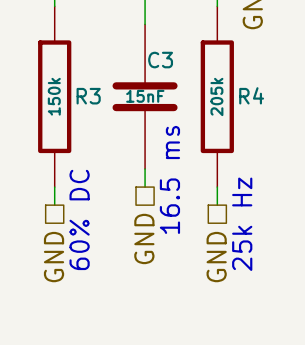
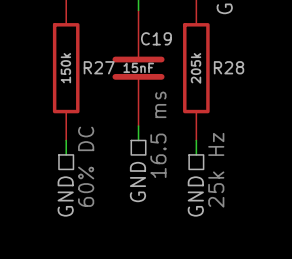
C3 name: C3 (160, 60) -> C19 (156, 38)
R4 name: R4 (251, 95) -> R28 (229, 67)
R3 name: R3 (88, 96) -> R27 (99, 67)

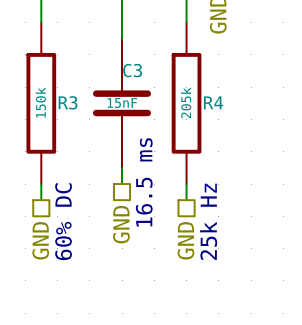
C19 name: C19 (156, 38) -> C3 (132, 70)
R27 name: R27 (99, 67) -> R3 (68, 102)
R28 name: R28 (229, 67) -> R4 (213, 102)

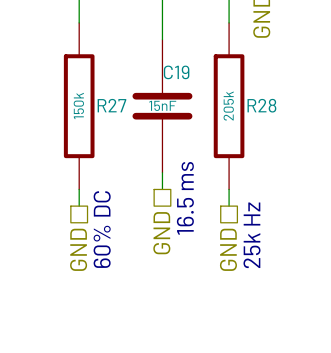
C3 name: C3 (132, 70) -> C19 (176, 72)
R3 name: R3 (68, 102) -> R27 (111, 105)
R4 name: R4 (213, 102) -> R28 (261, 105)

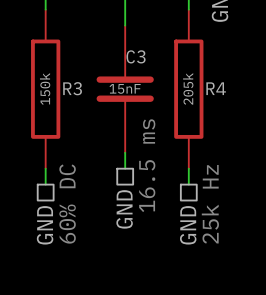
C19 name: C19 (176, 72) -> C3 (136, 56)
R27 name: R27 (111, 105) -> R3 (72, 88)
R28 name: R28 (261, 105) -> R4 (216, 88)

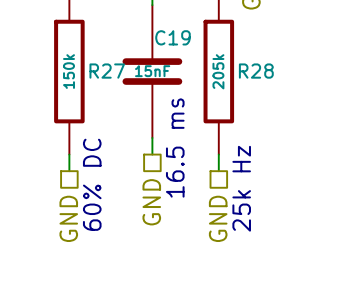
C3 name: C3 (136, 56) -> C19 (173, 37)
R3 name: R3 (72, 88) -> R27 (107, 71)
R4 name: R4 (216, 88) -> R28 (256, 71)

